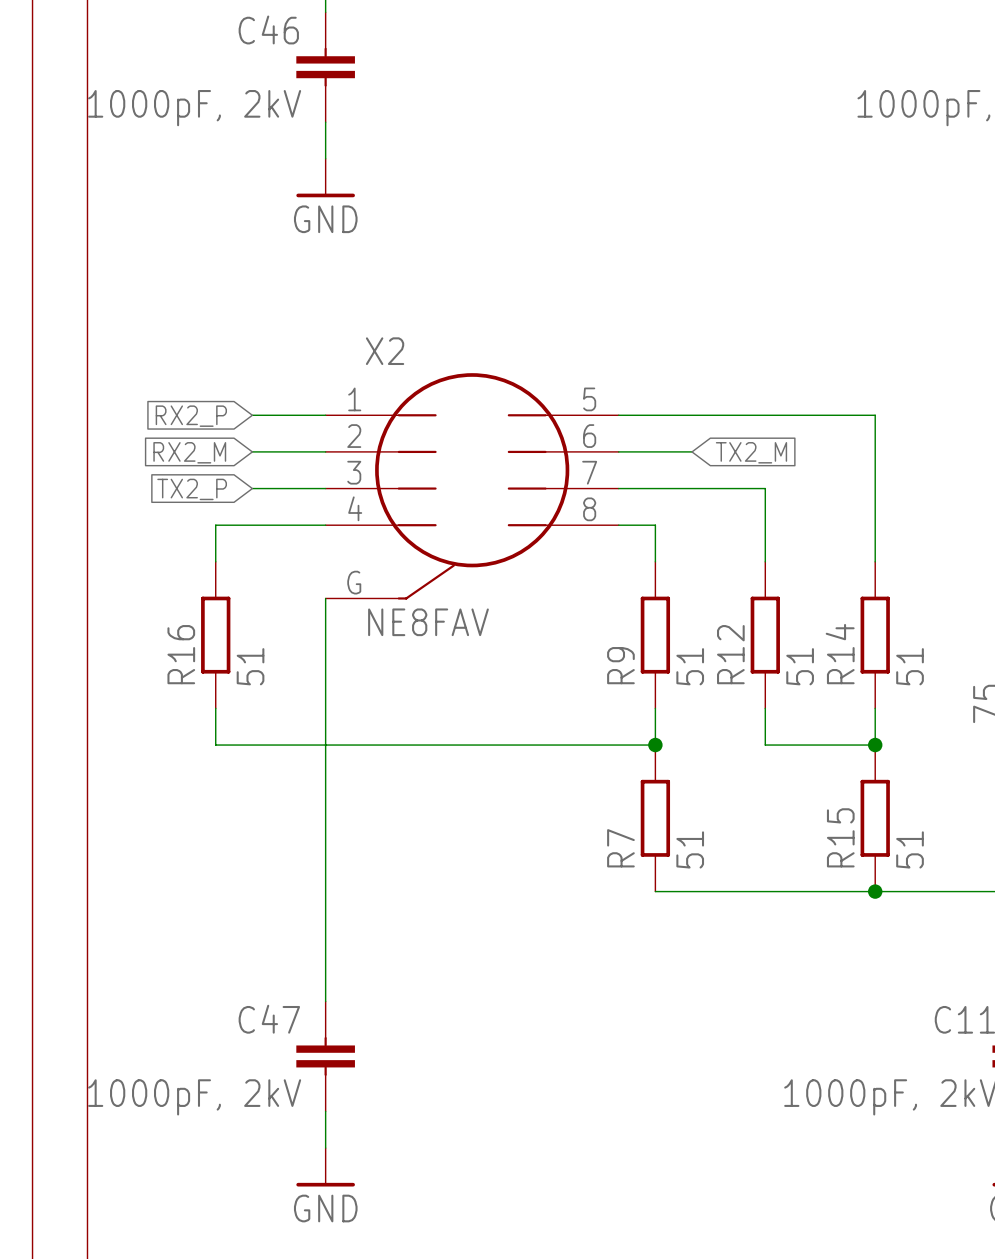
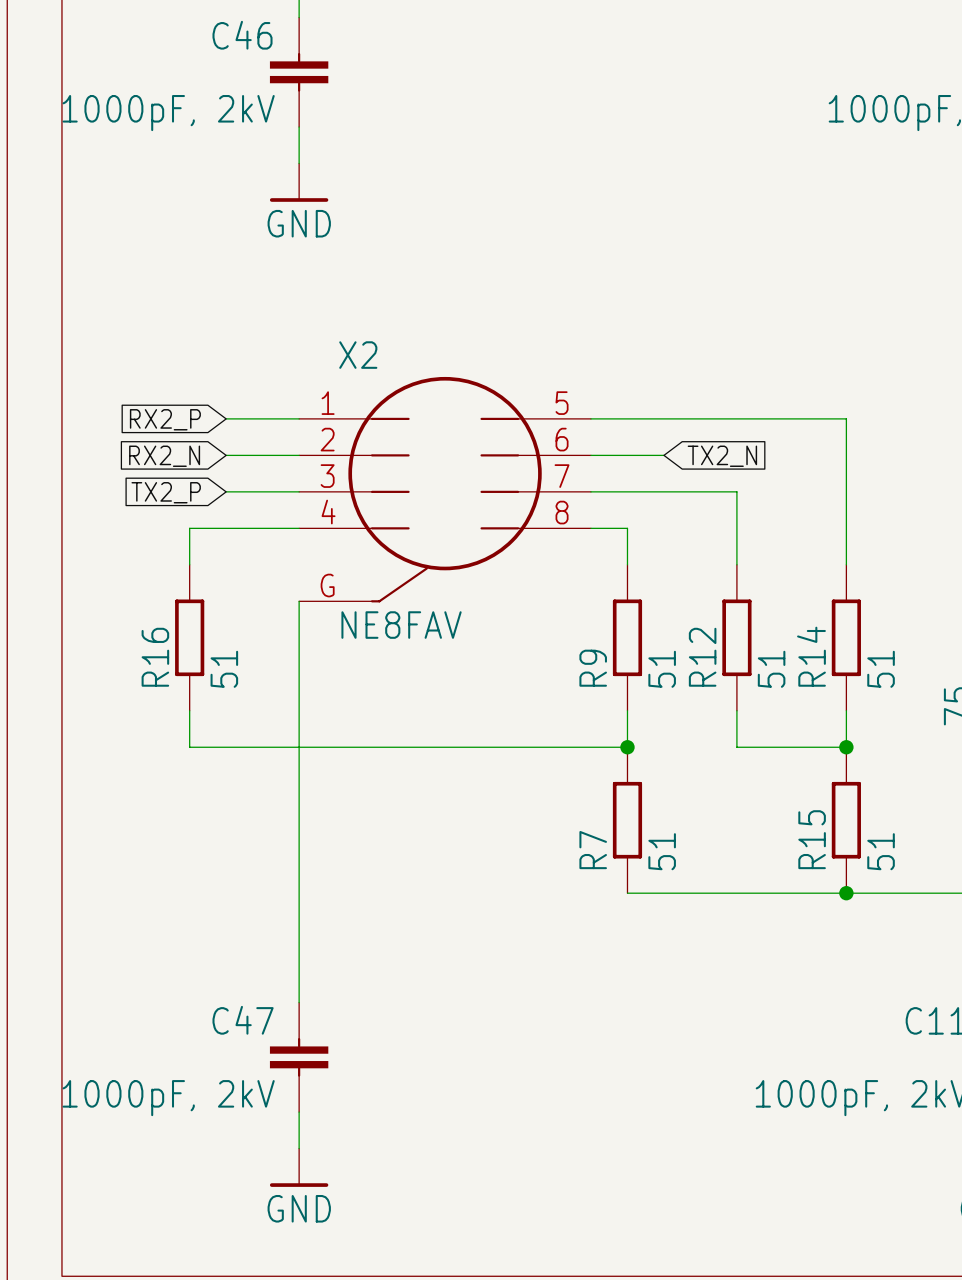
global label: RX2_M (189, 452) -> RX2_N (164, 456)
global label: TX2_M (751, 452) -> TX2_N (722, 456)

